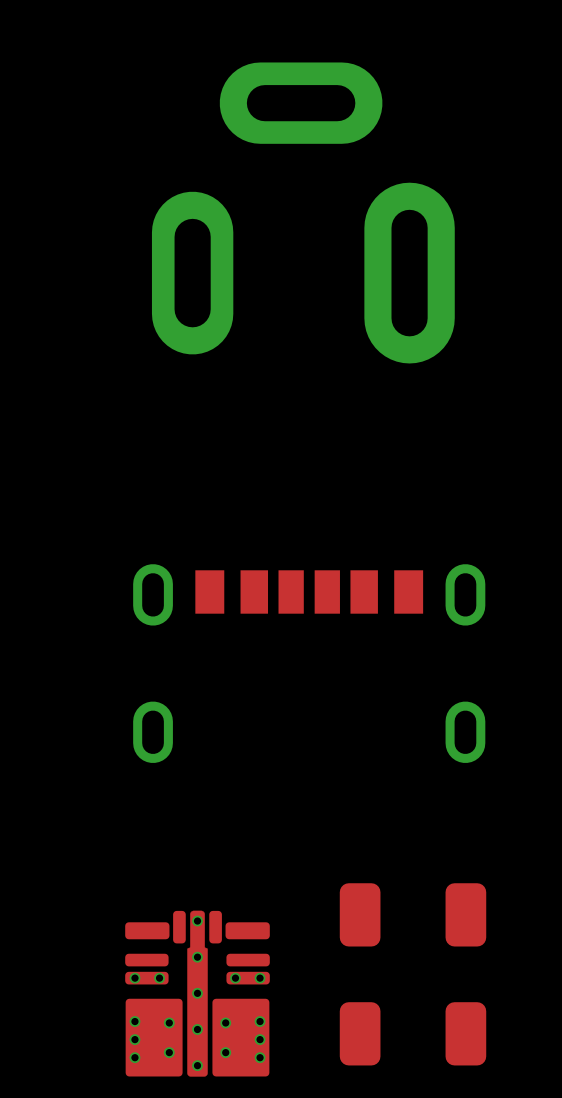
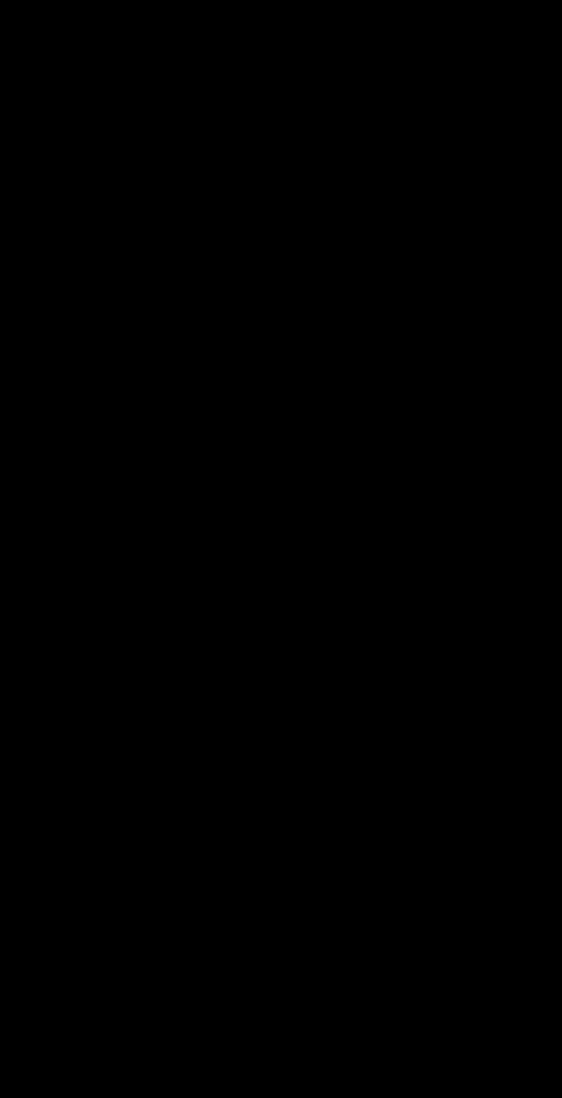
part: (303, 212) -> none
part: (309, 663) -> none
part: (413, 914) -> none
part: (197, 993) -> none
part: (413, 1033) -> none

